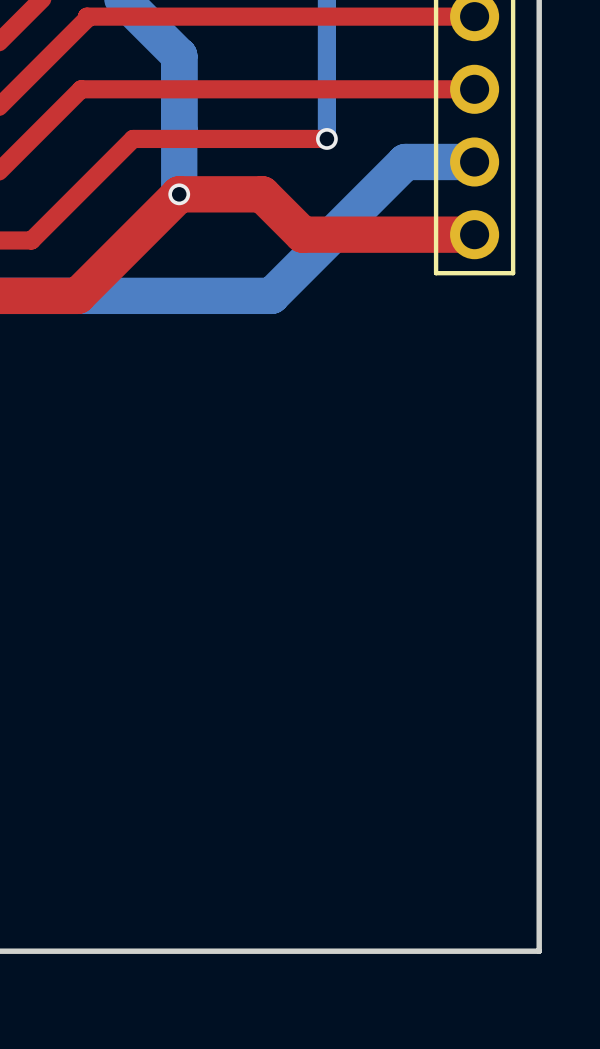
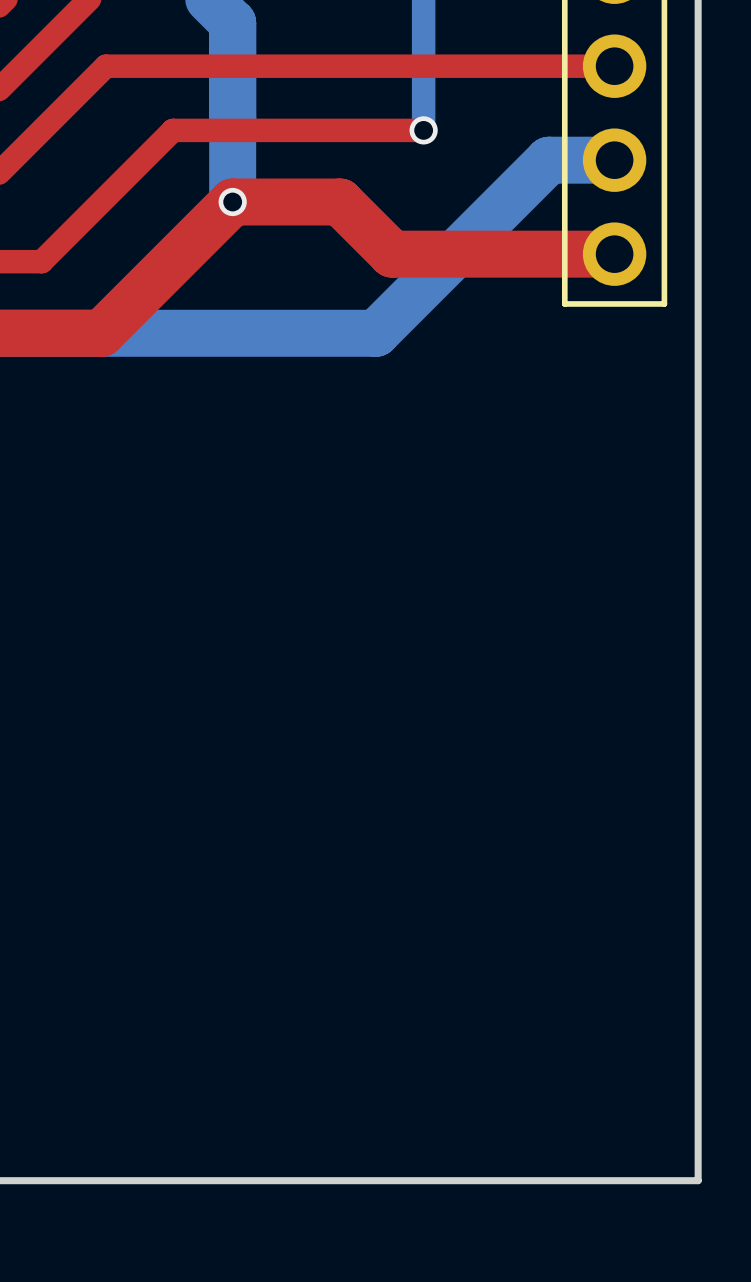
bottom track: (423, 161) (405, 161) (271, 295) -> (549, 160) (375, 333) (352, 333)

